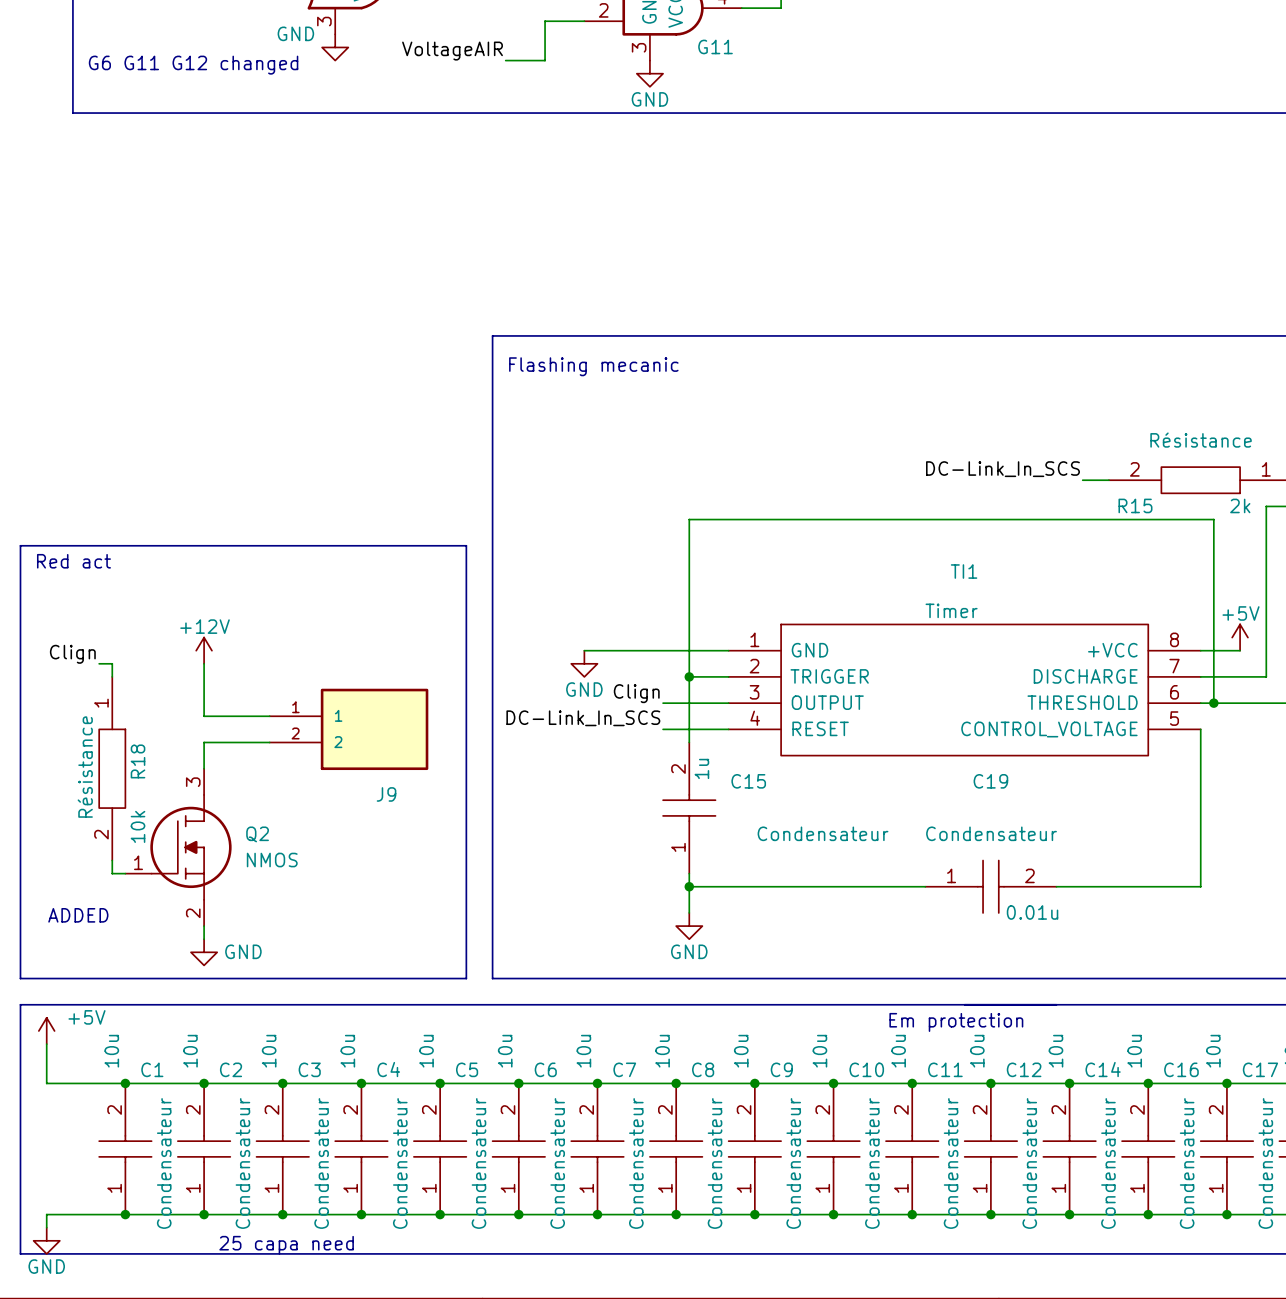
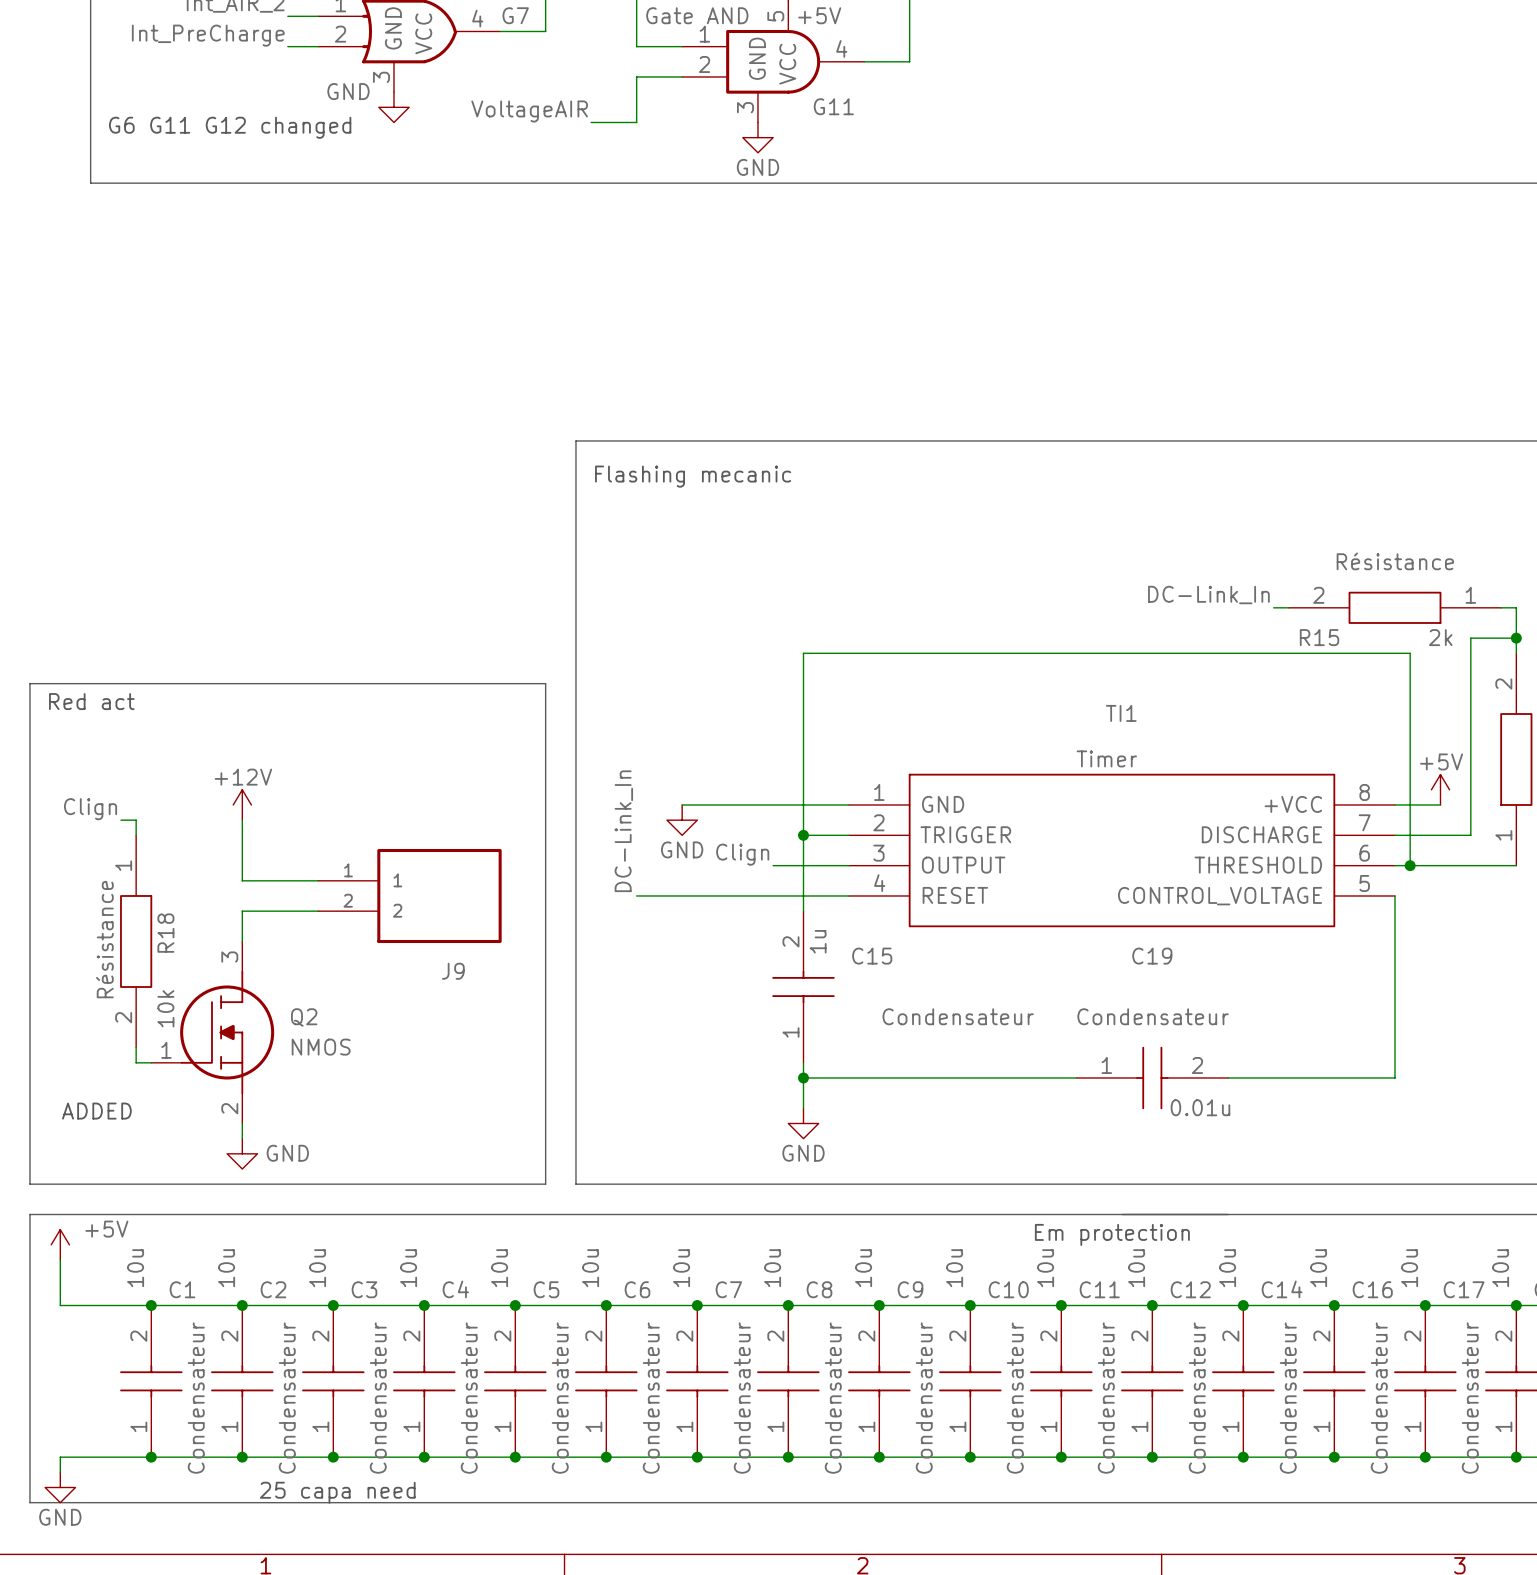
label: DC-Link_In_SCS (1002, 469) -> DC-Link_In (1208, 595)
wire: (1082, 480) (1095, 480) -> none
label: DC-Link_In_SCS (583, 718) -> DC-Link_In (623, 831)
wire: none -> (636, 895) (773, 895)

